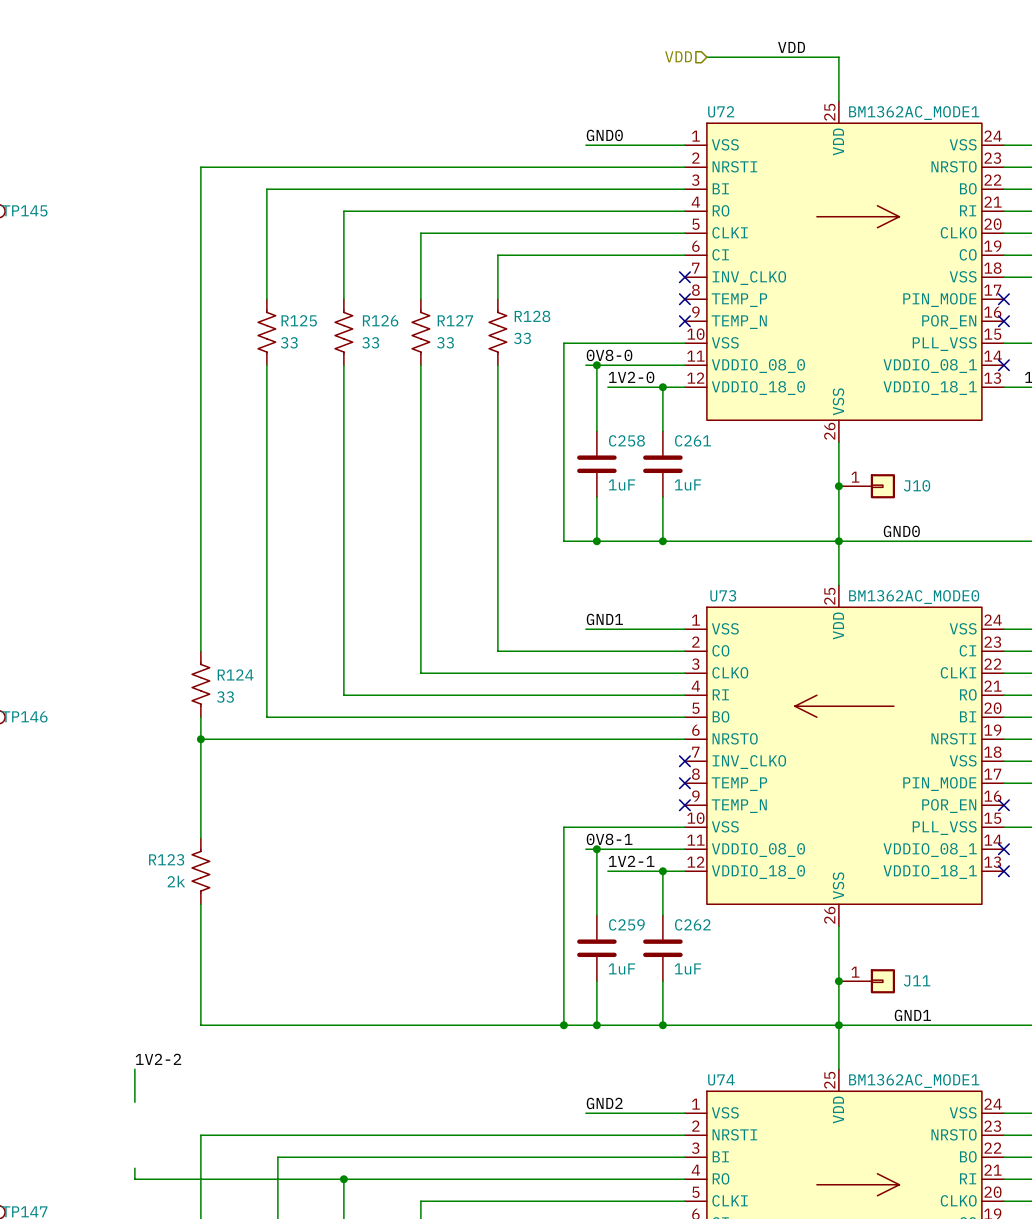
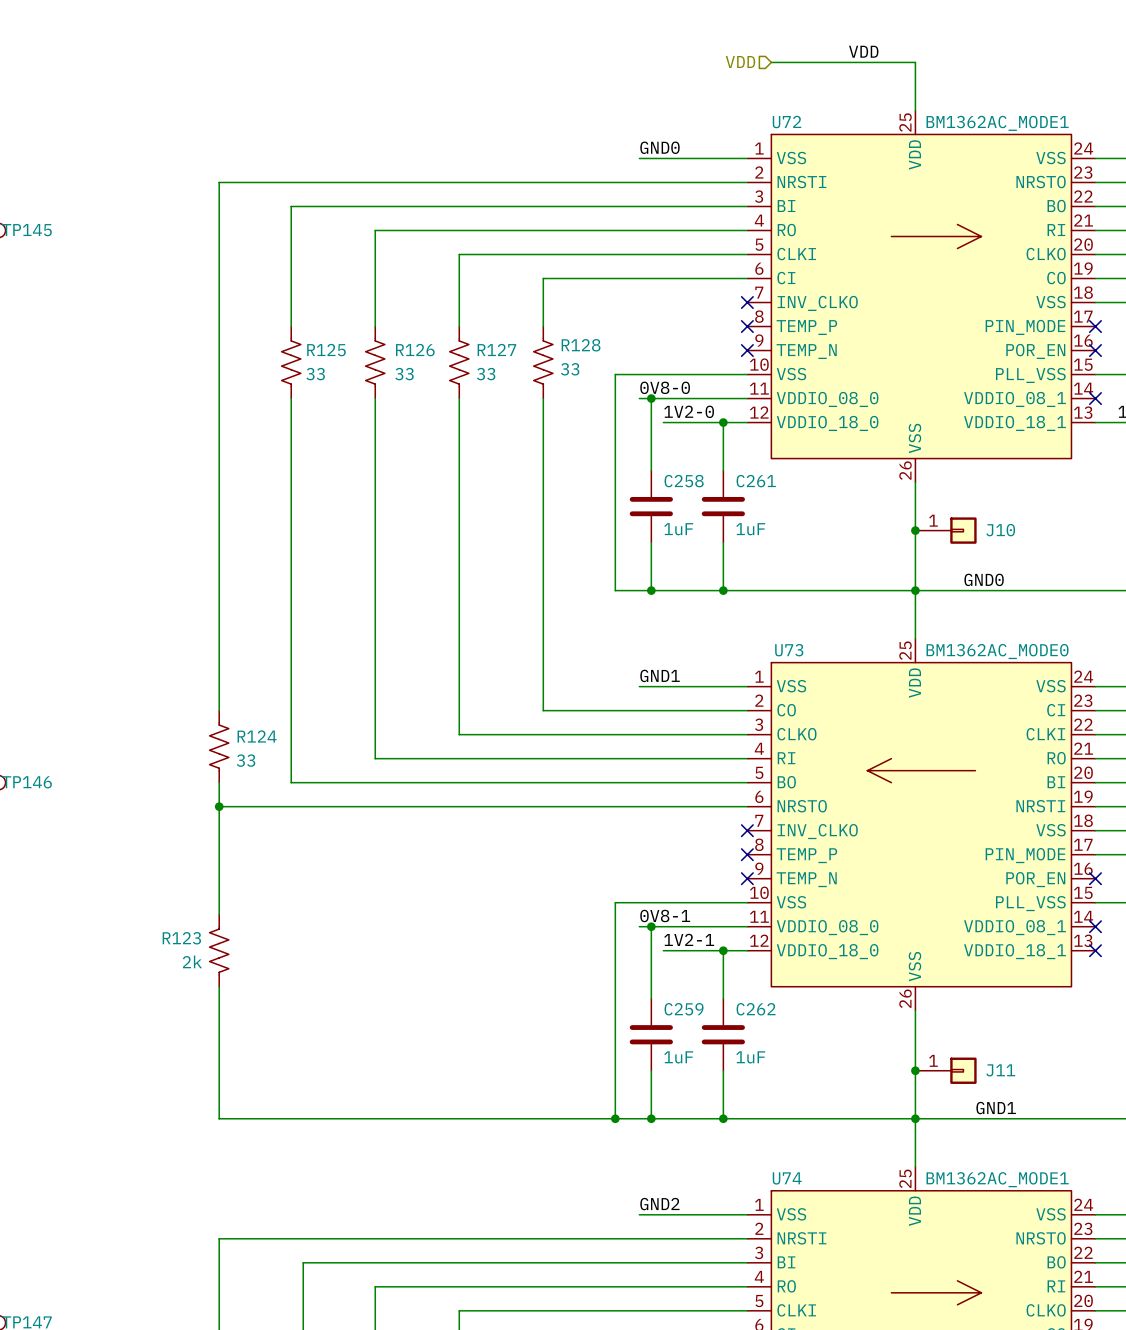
label: 1V2-2 (158, 1059) -> none
wire: (134, 1069) (134, 1102) -> none
wire: (134, 1168) (134, 1179) (343, 1179) -> none
junction: (343, 1179) -> none

